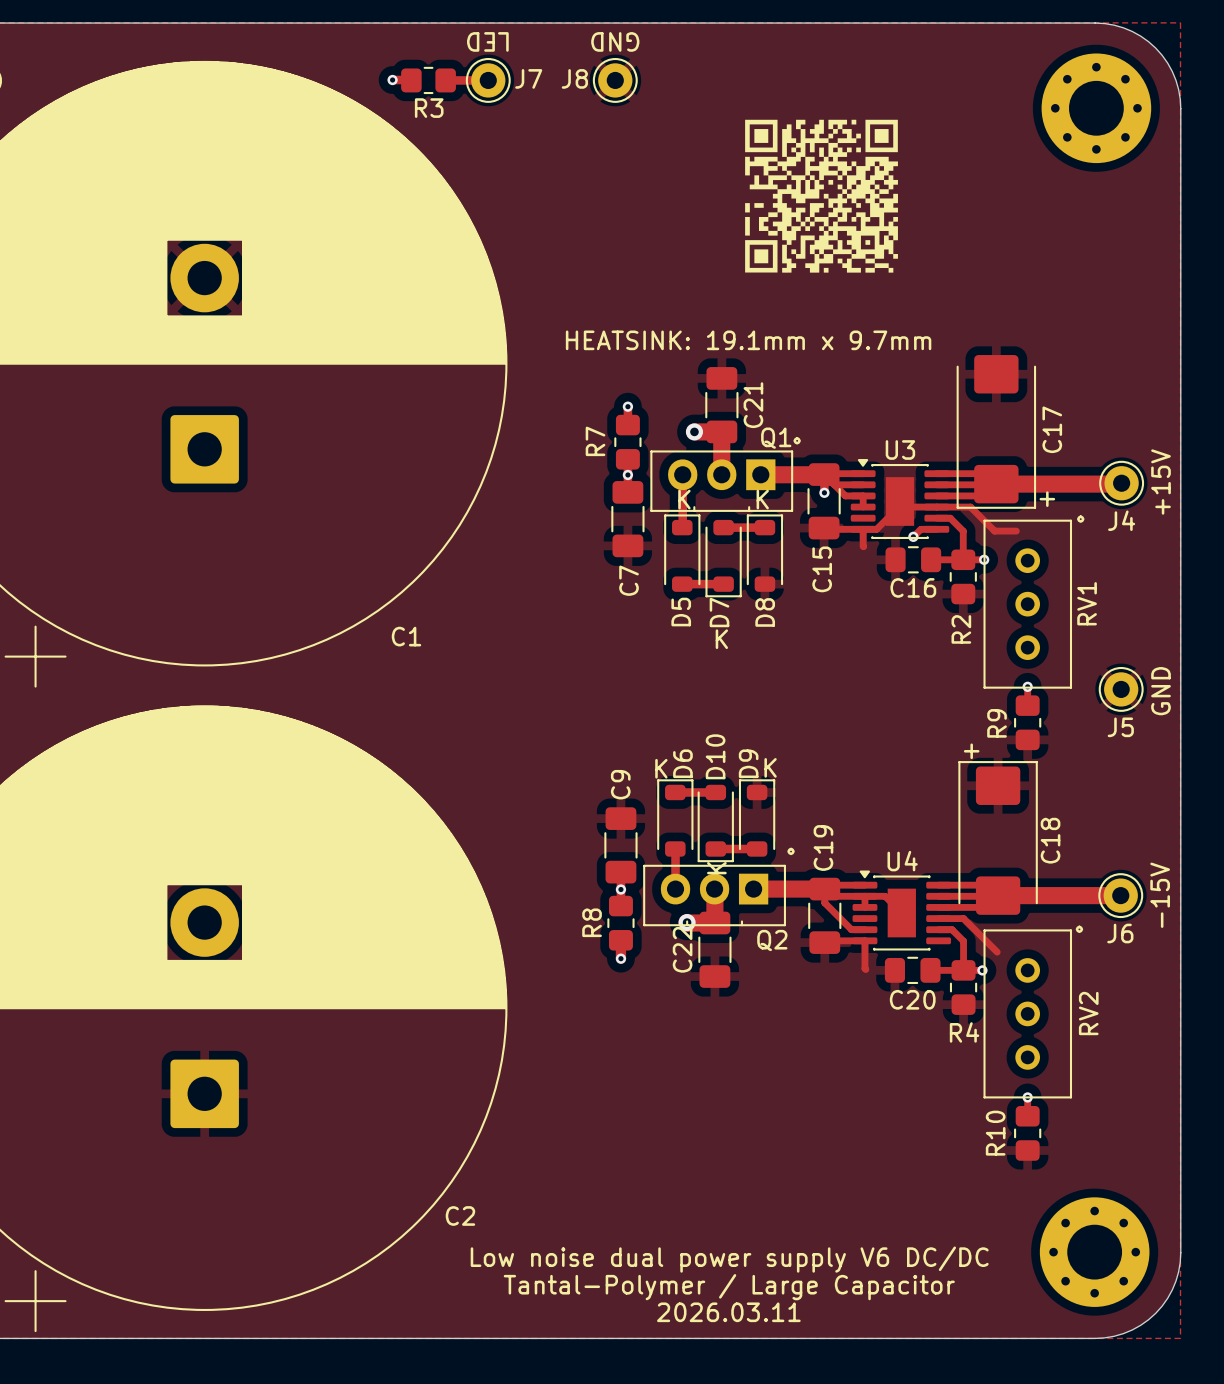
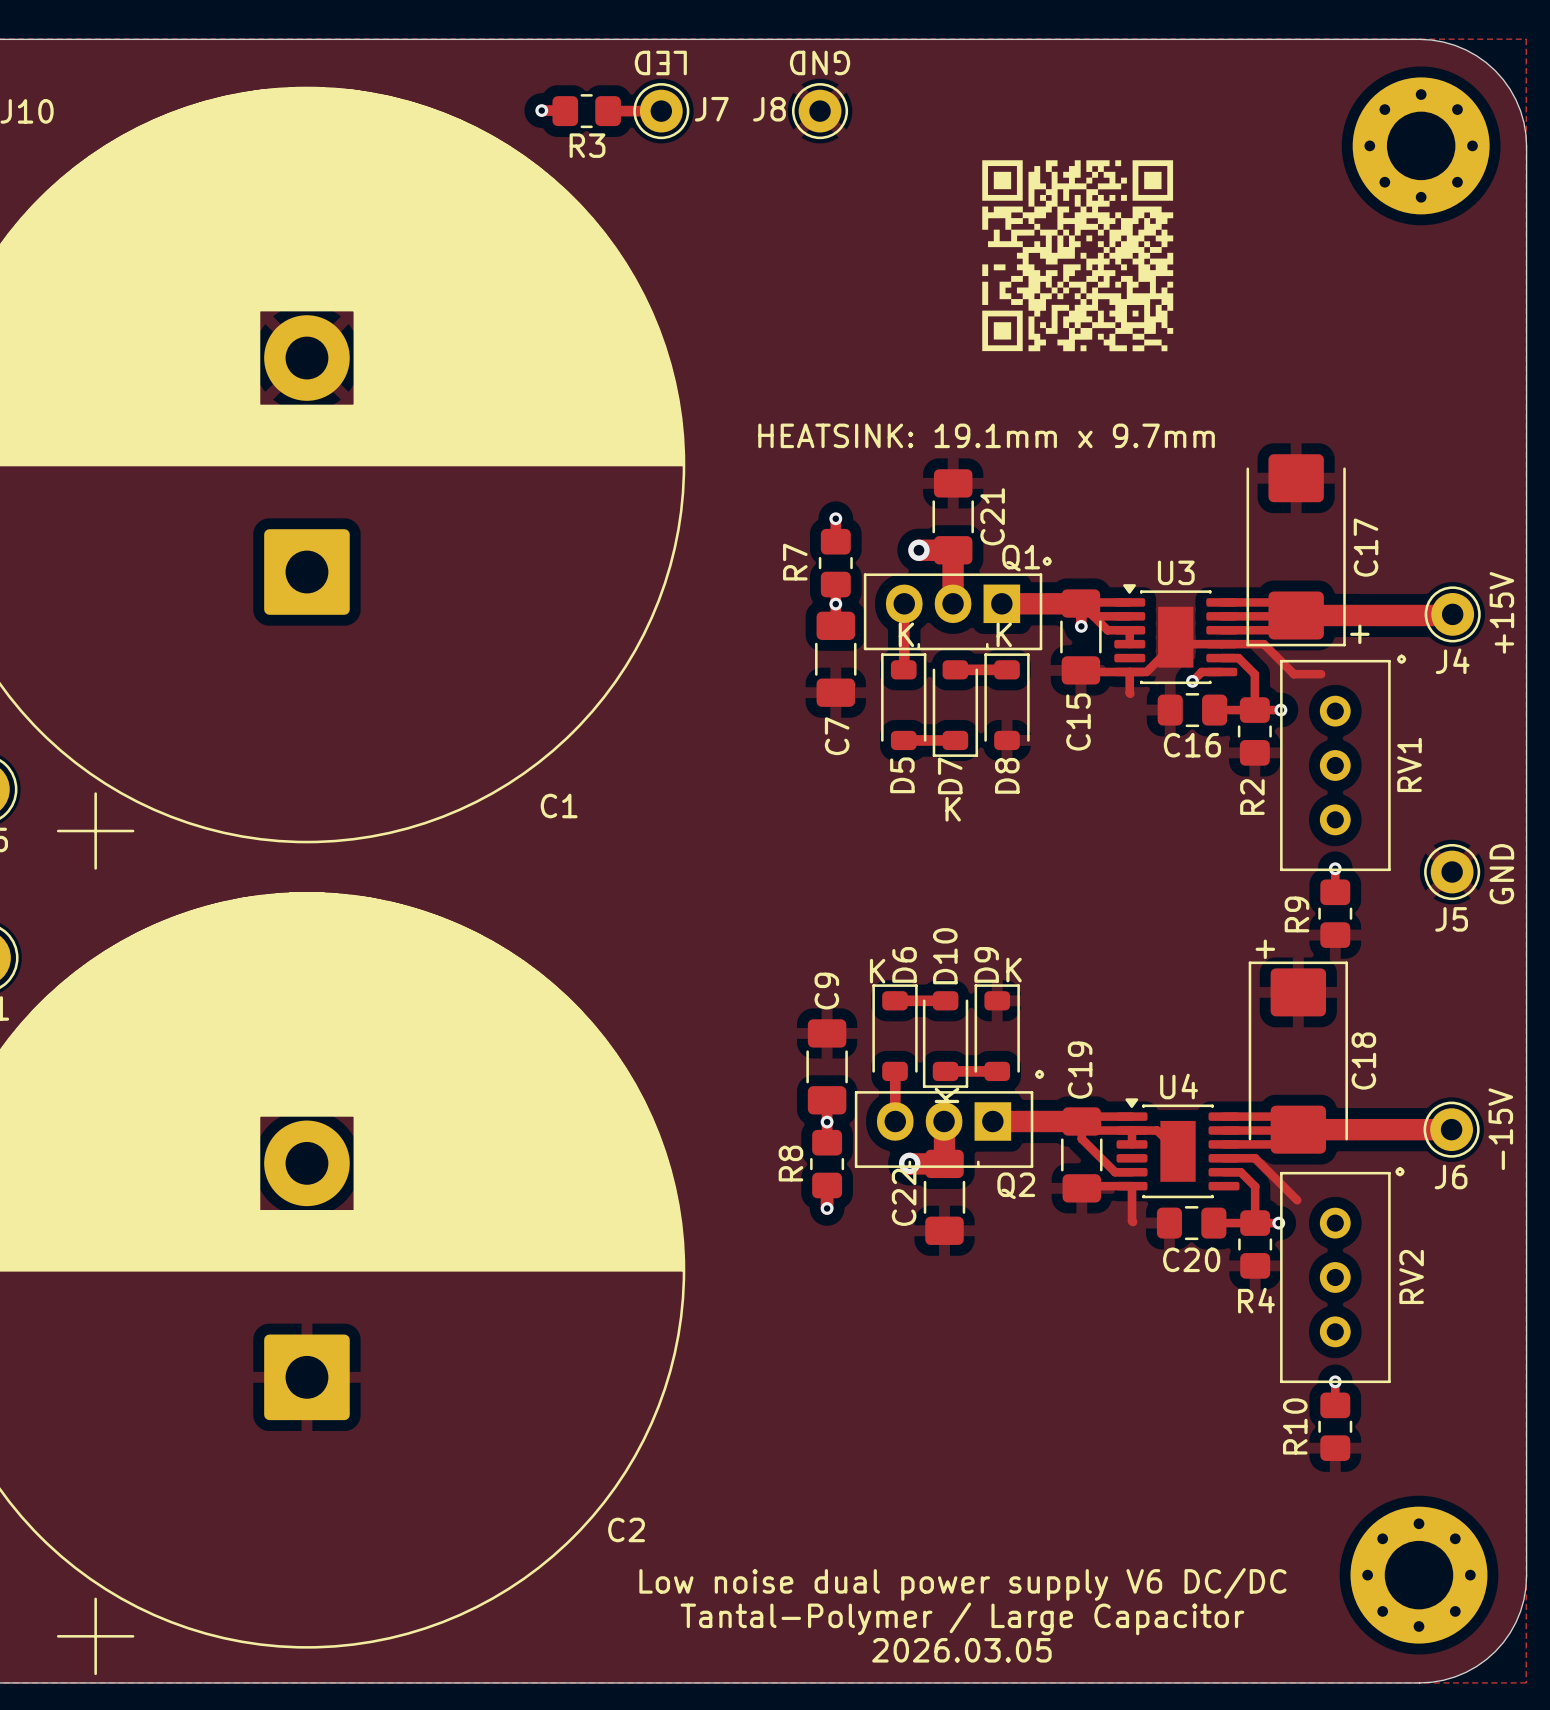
text: 2026.03.11 (728, 1312) -> 2026.03.05 (961, 1650)

